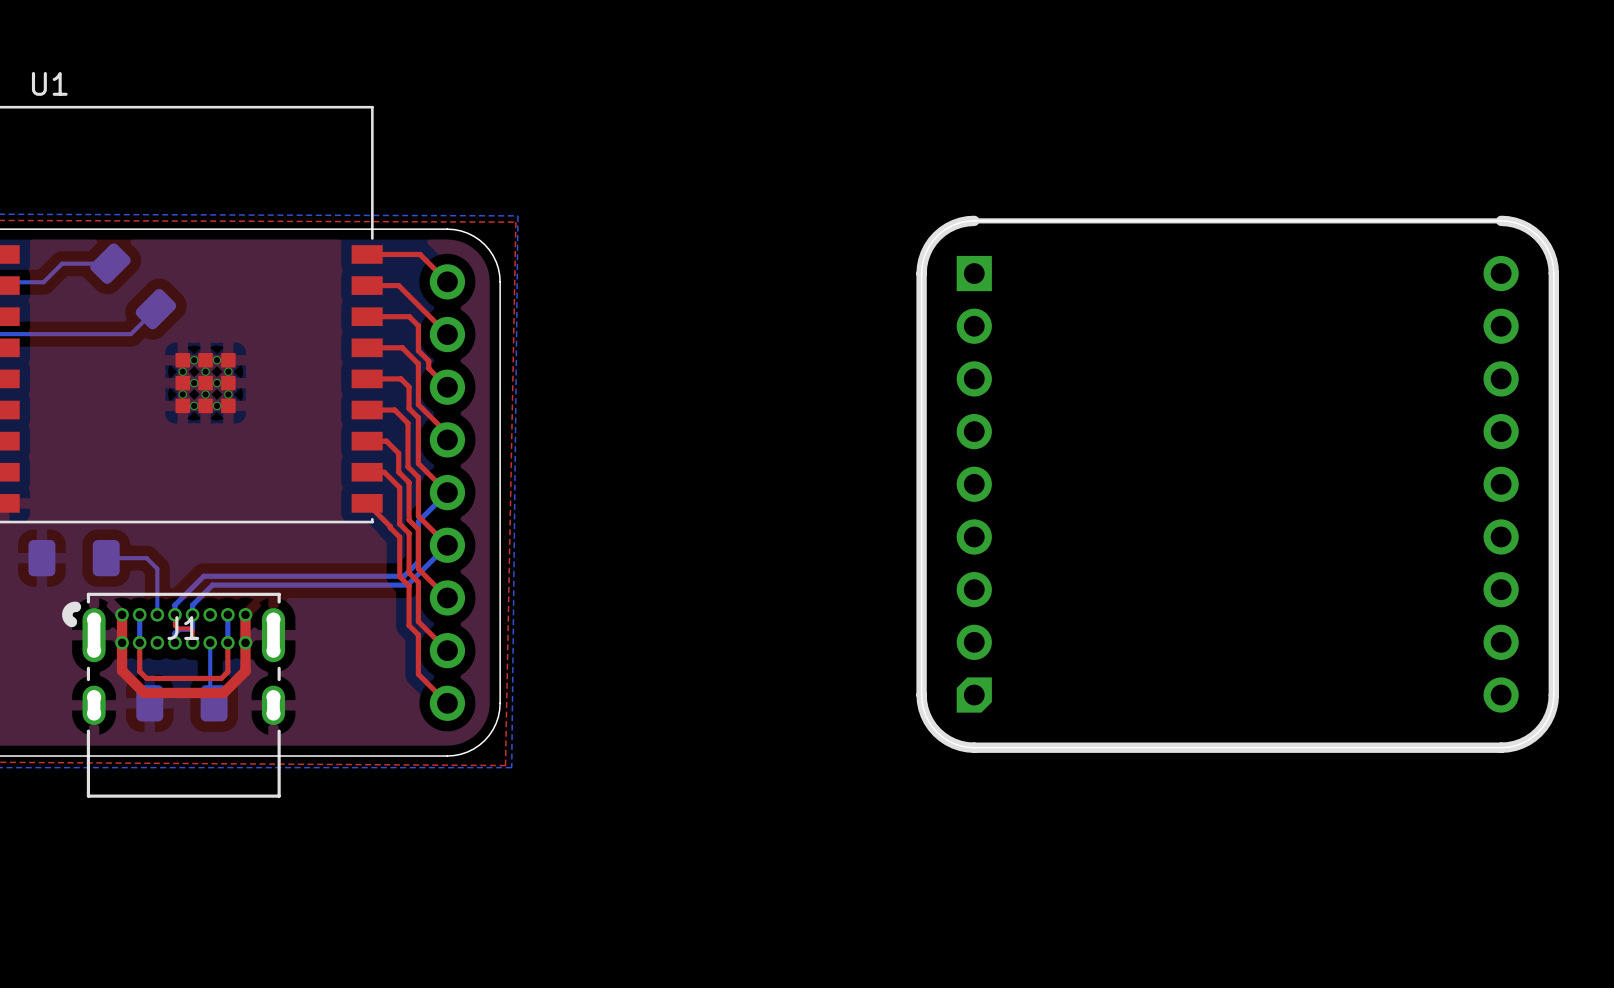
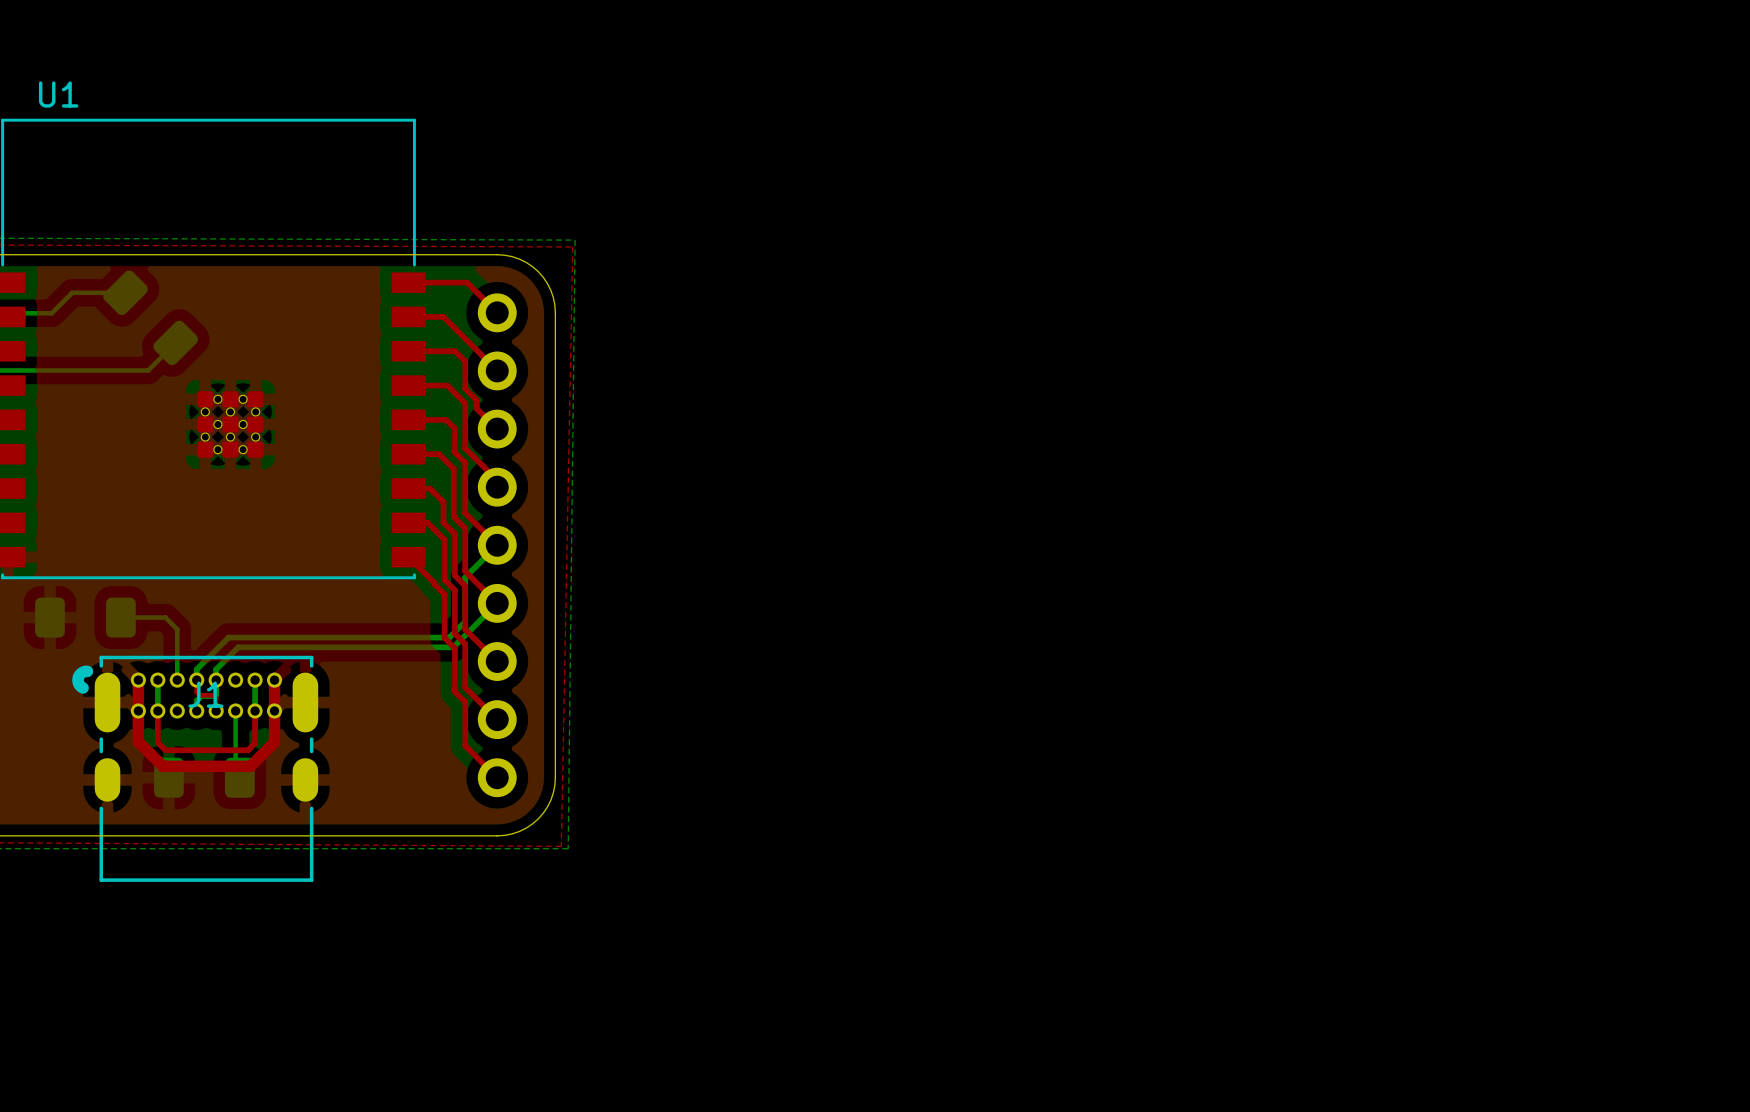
part: (1237, 484) -> none

